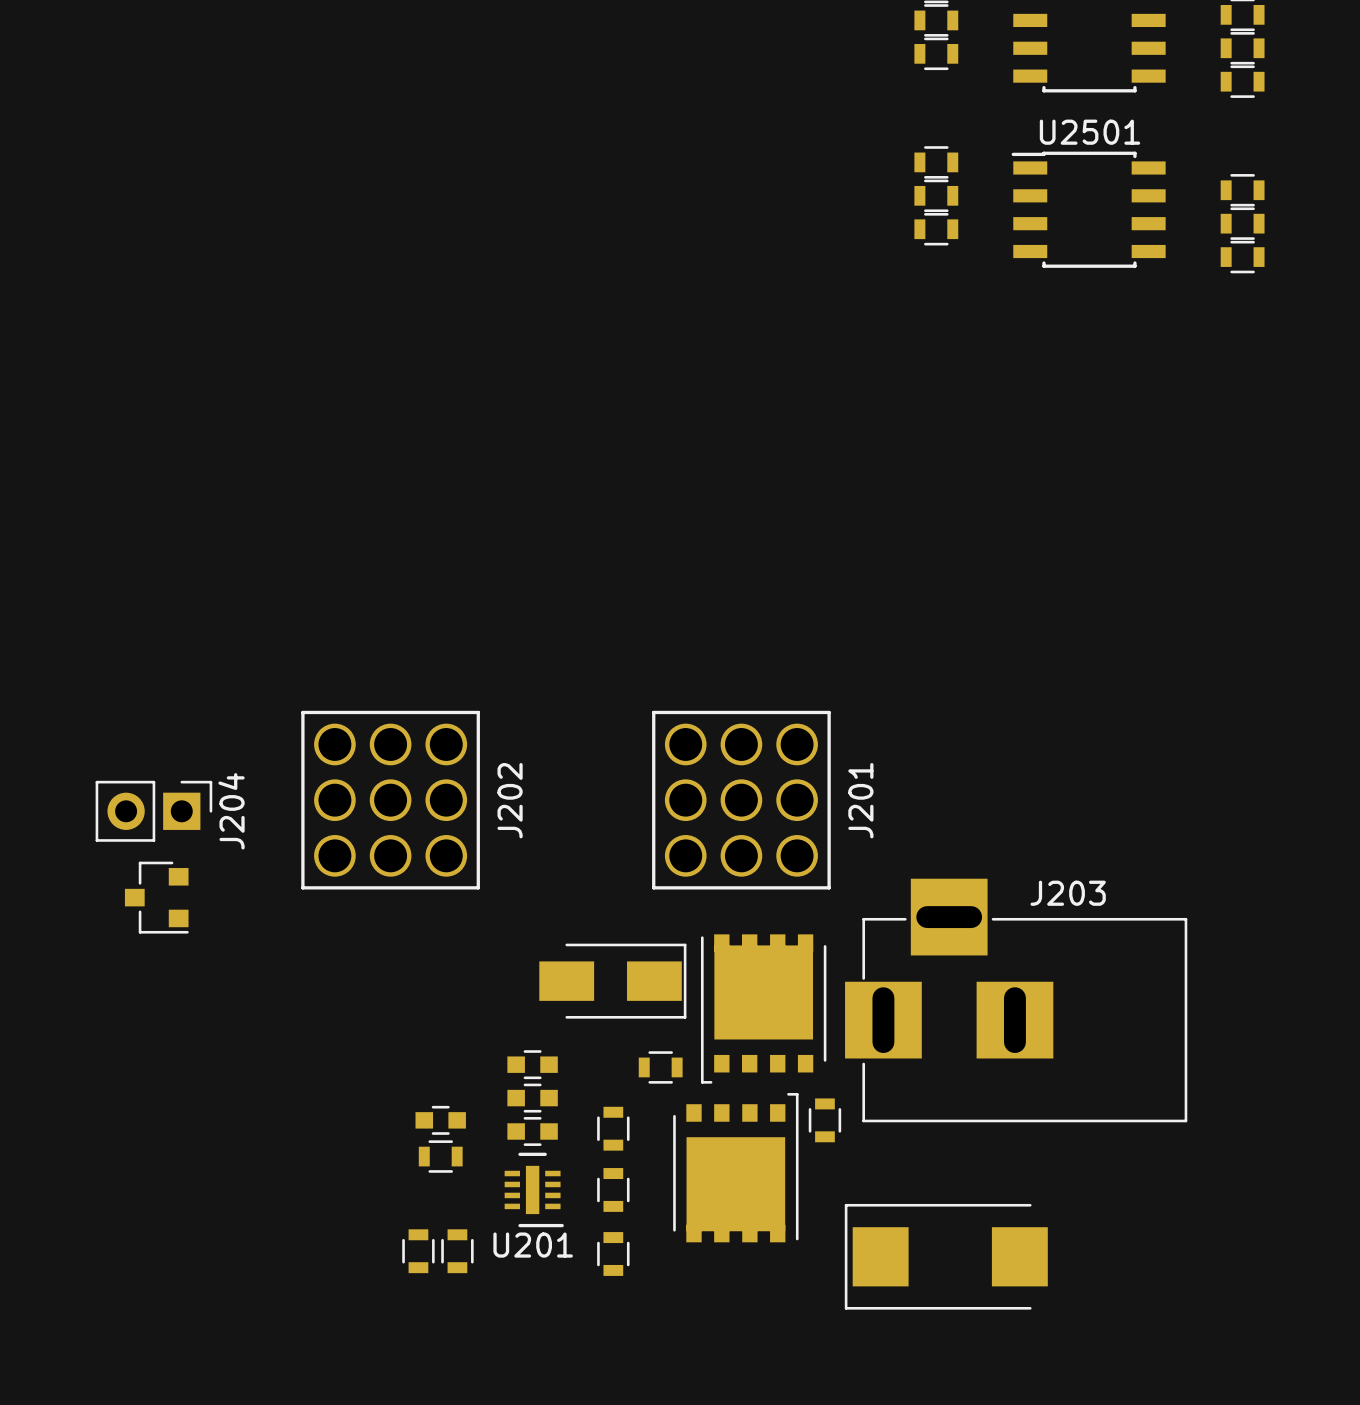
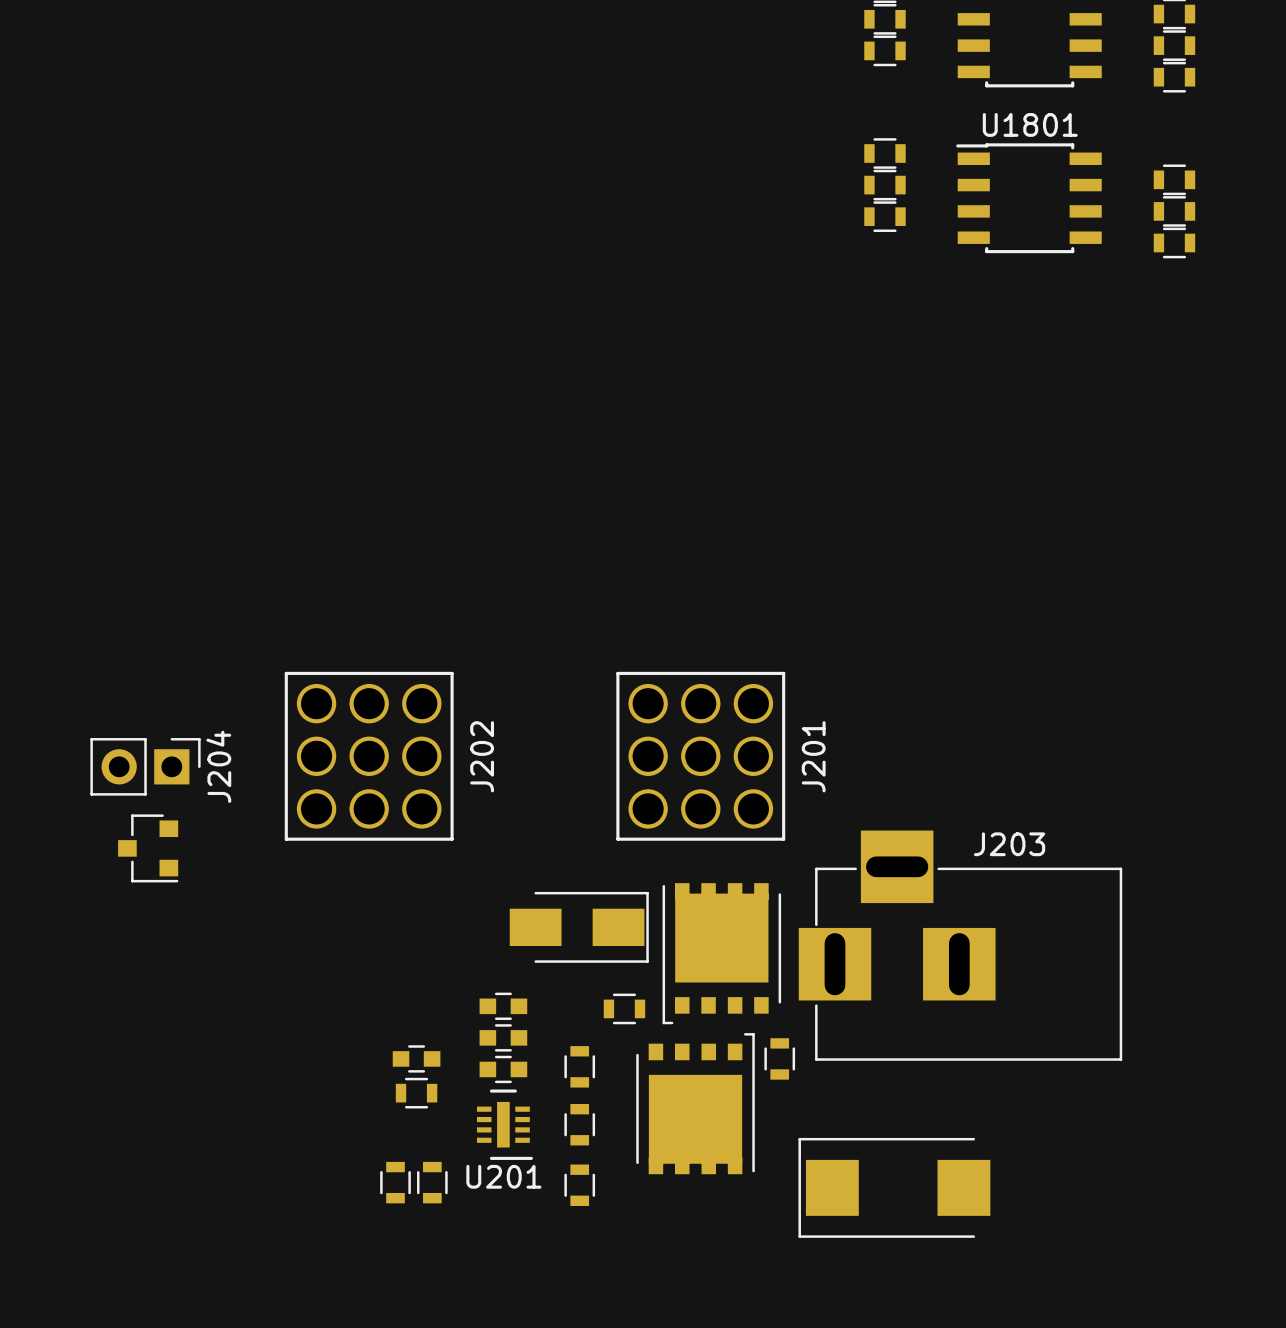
U2501 name: U2501 (1089, 132) -> U1801 (1030, 124)

